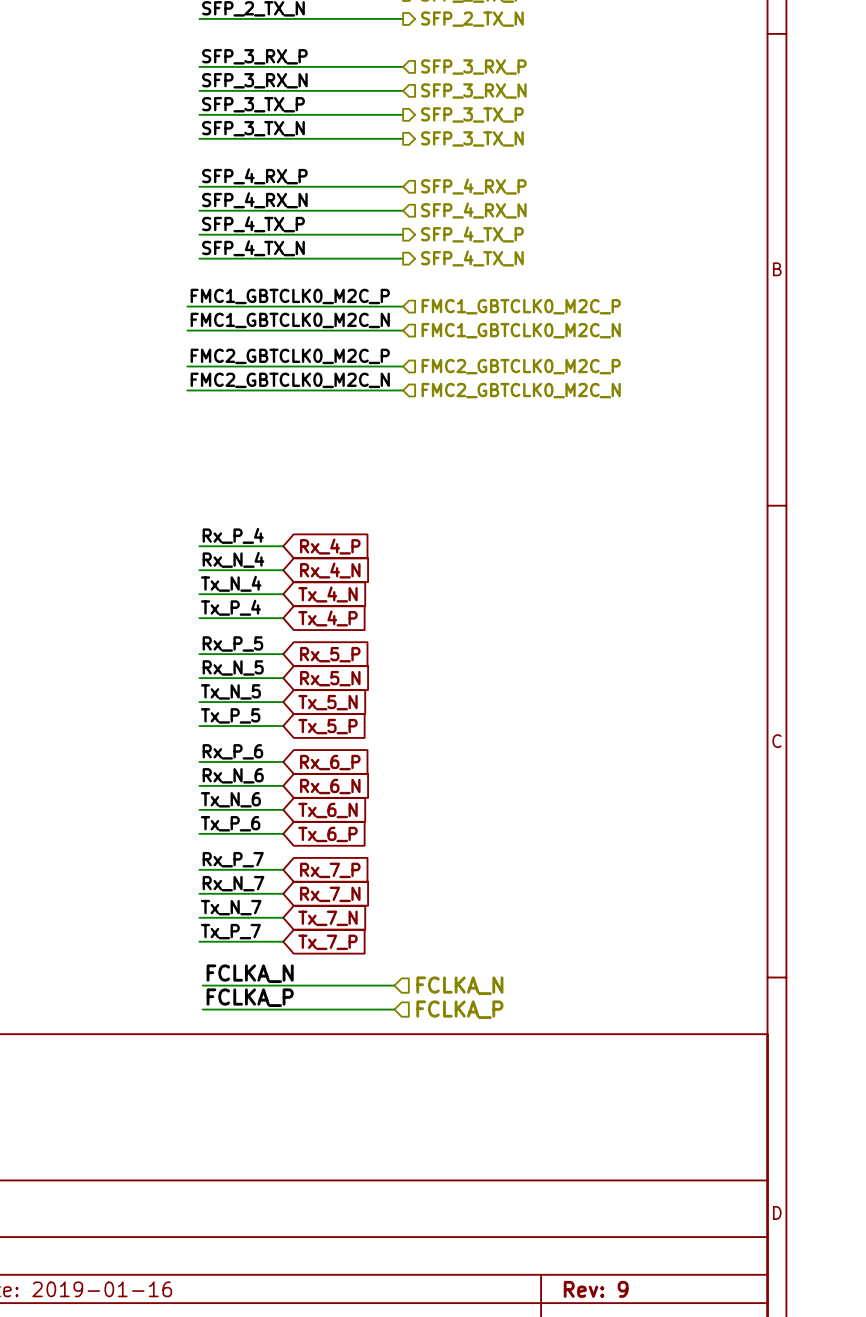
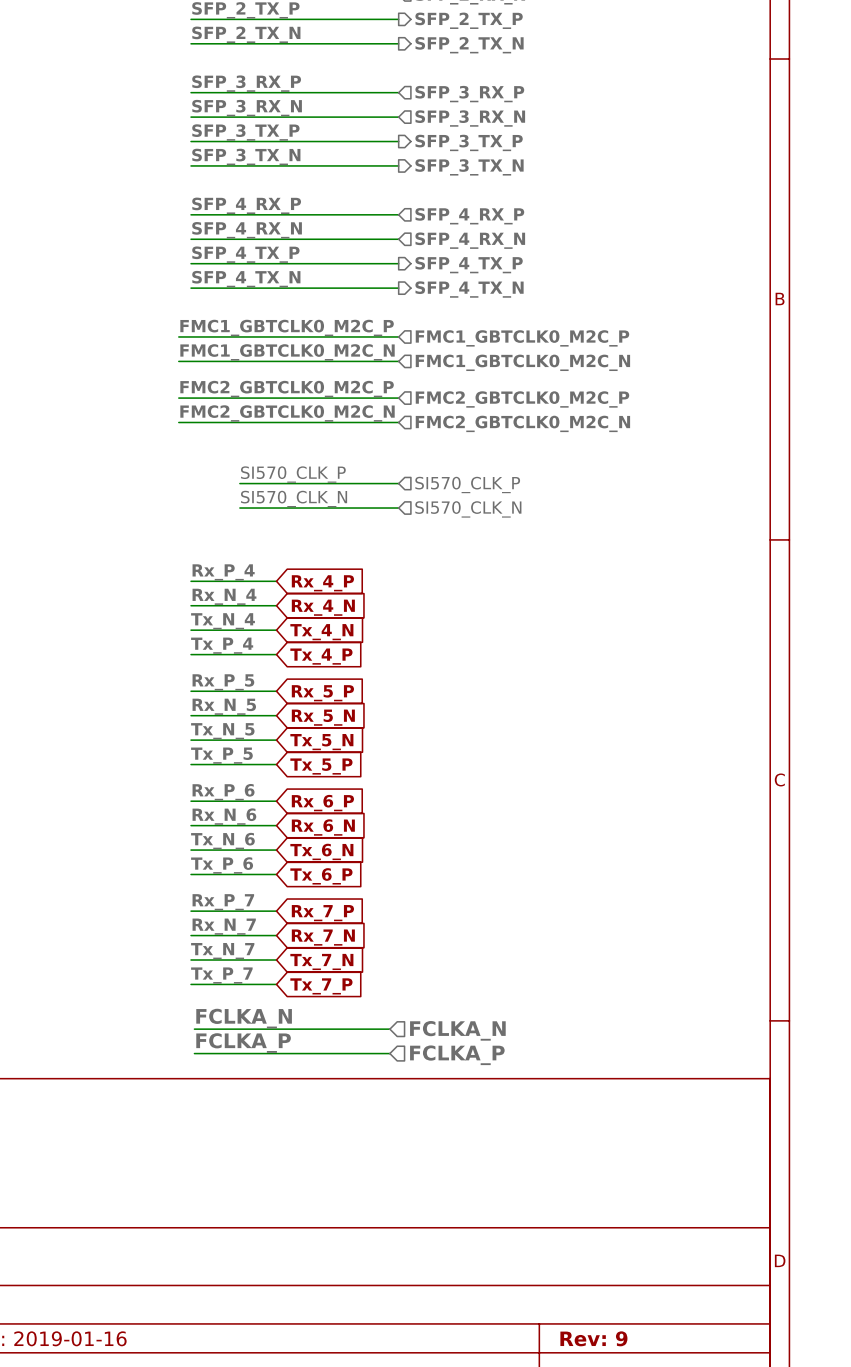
label: none -> SI570_CLK_P (293, 474)
wire: none -> (239, 483) (398, 483)
hierarchical label: none -> SI570_CLK_P (467, 484)
label: none -> SI570_CLK_N (294, 498)
wire: none -> (239, 508) (398, 508)
hierarchical label: none -> SI570_CLK_N (468, 509)

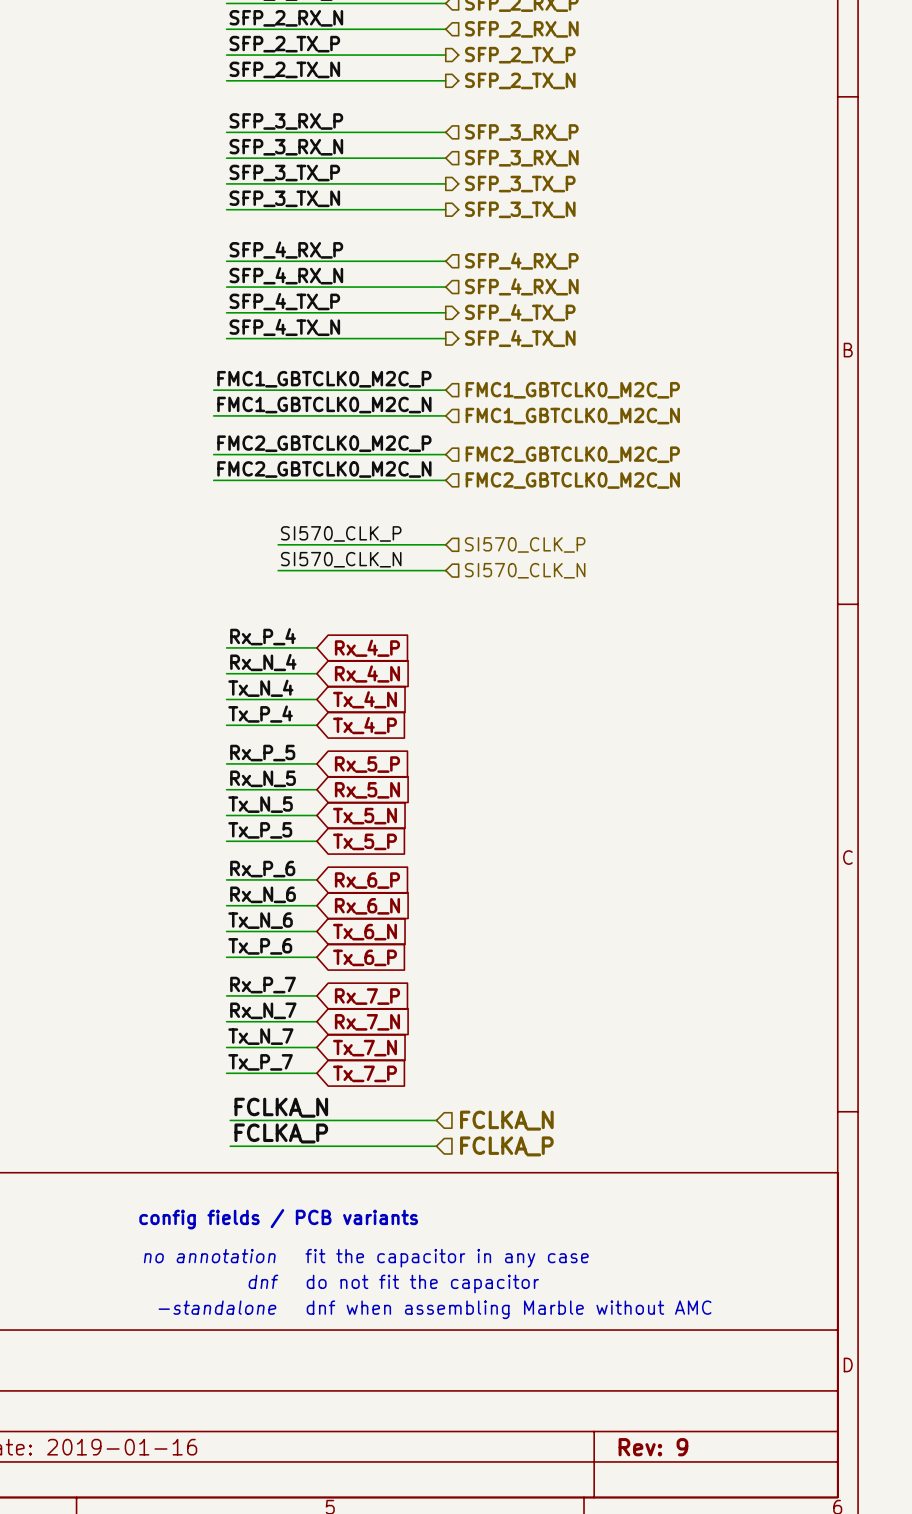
text: none -> config fields / PCB variants (278, 1219)
text: none -> no annotation (209, 1256)
text: none -> fit the capacitor in any case (447, 1258)
text: none -> dnf (263, 1281)
text: none -> do not fit the capacitor (422, 1283)
text: none -> -standalone (217, 1307)
text: none -> dnf when assembling Marble without AMC (509, 1309)

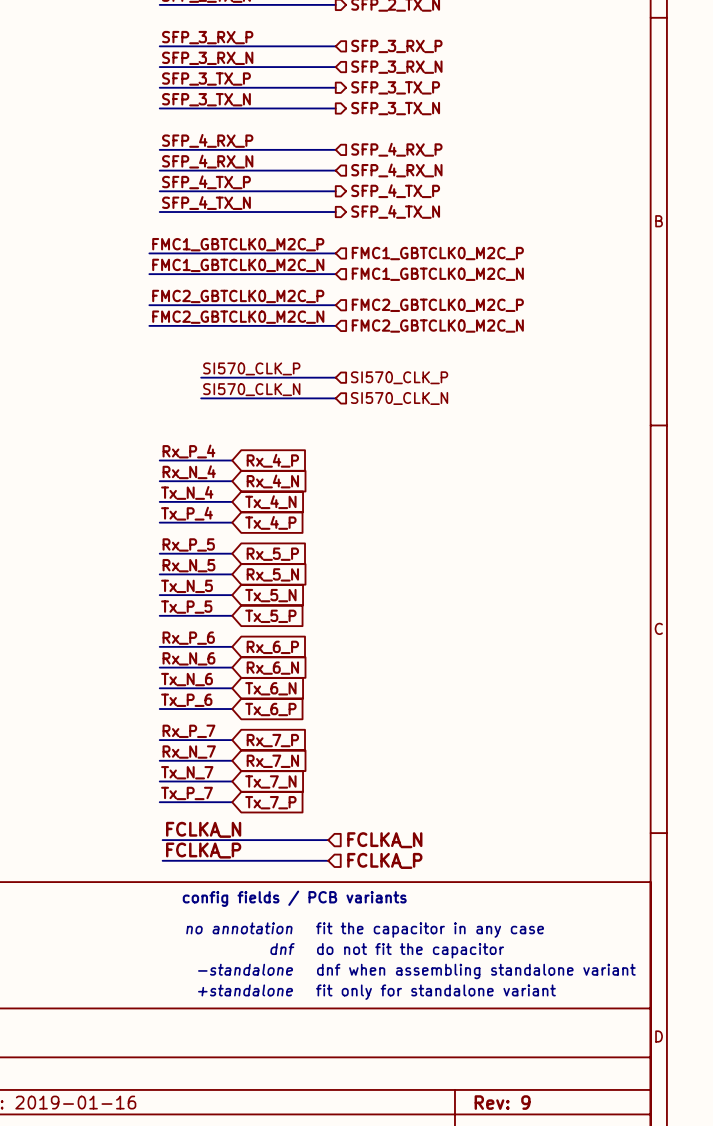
text position: config fields / PCB variants (278, 1219) -> config fields / PCB variants (294, 898)
text position: no annotation (209, 1256) -> no annotation (239, 928)
text position: fit the capacitor in any case (447, 1258) -> fit the capacitor in any case (430, 930)
text position: dnf (263, 1281) -> dnf (282, 949)
text position: do not fit the capacitor (422, 1283) -> do not fit the capacitor (410, 950)
text position: -standalone (217, 1307) -> -standalone (245, 969)
text: none -> +standalone (245, 990)
text: dnf when assembling Marble without AMC (509, 1309) -> dnf when assembling standalone variant (476, 971)
text: none -> fit only for standalone variant (435, 992)

